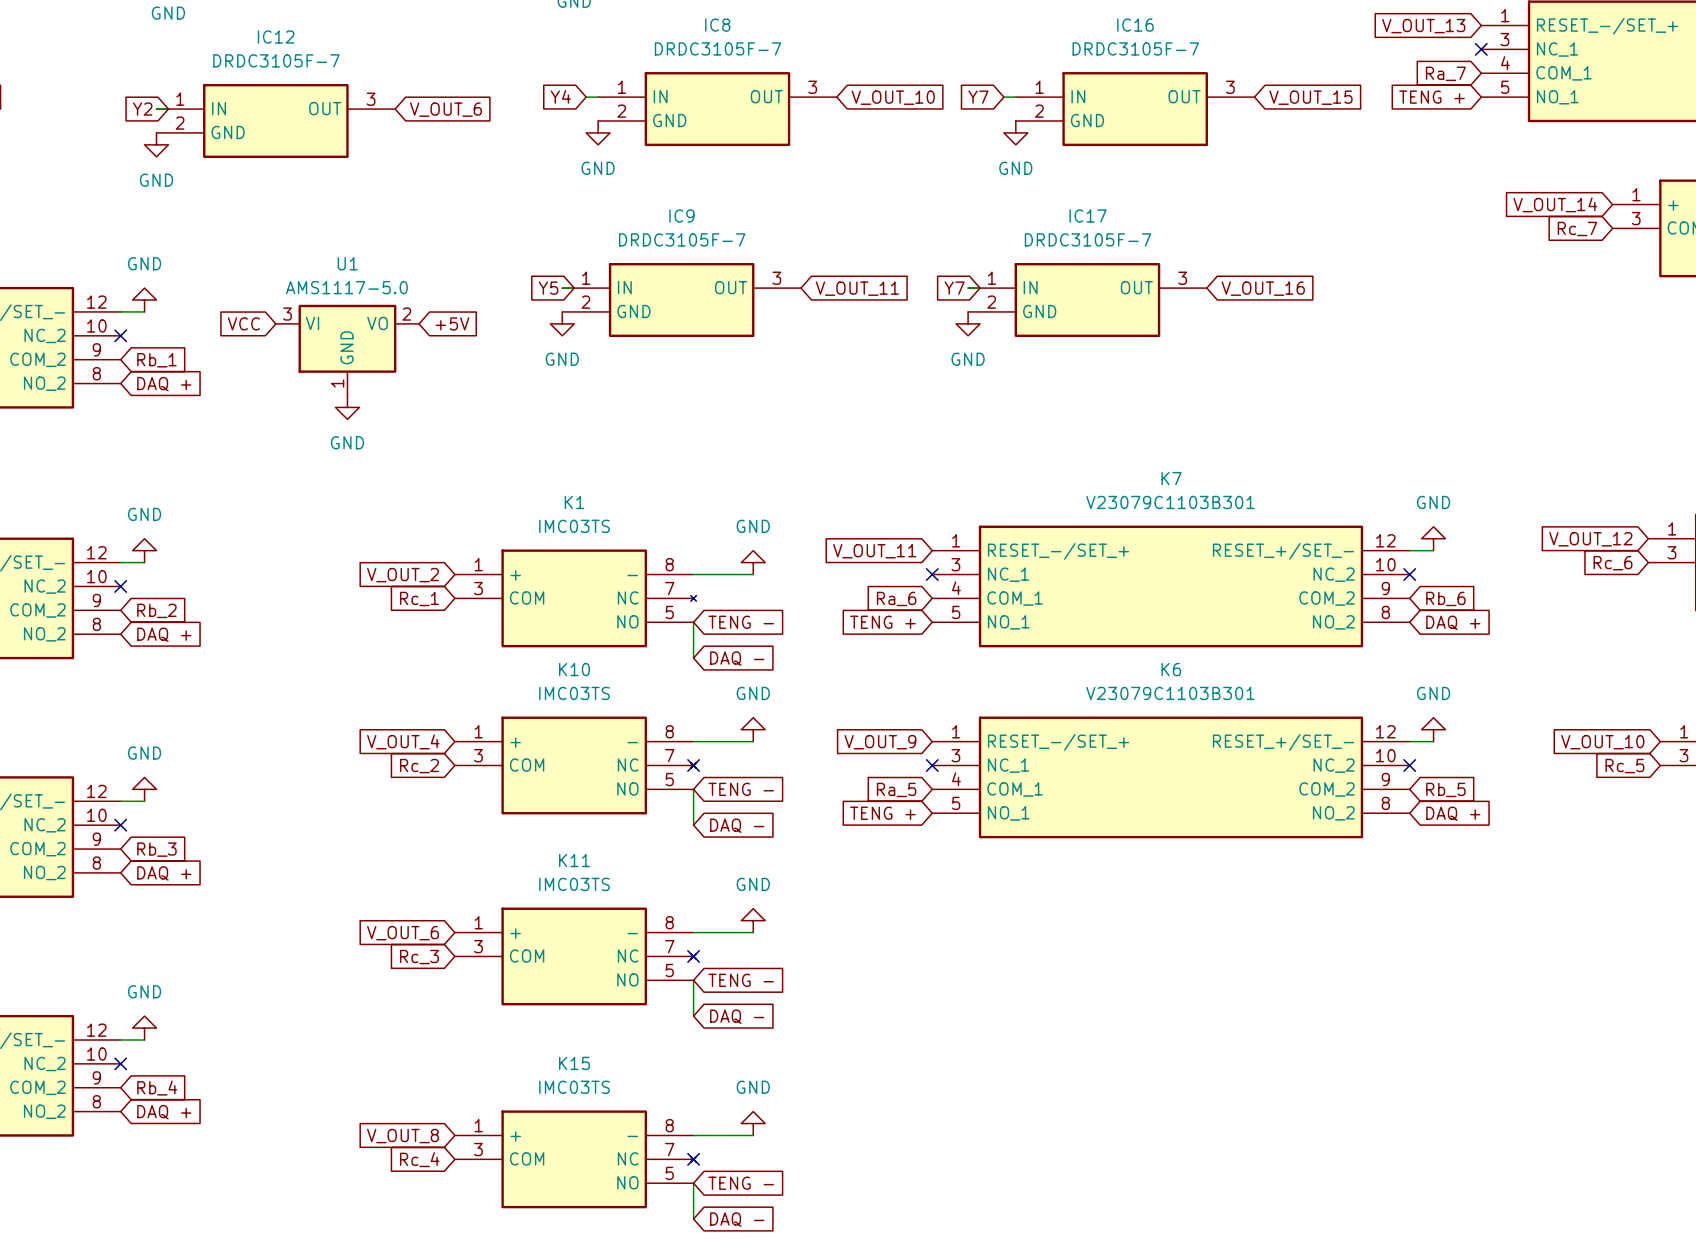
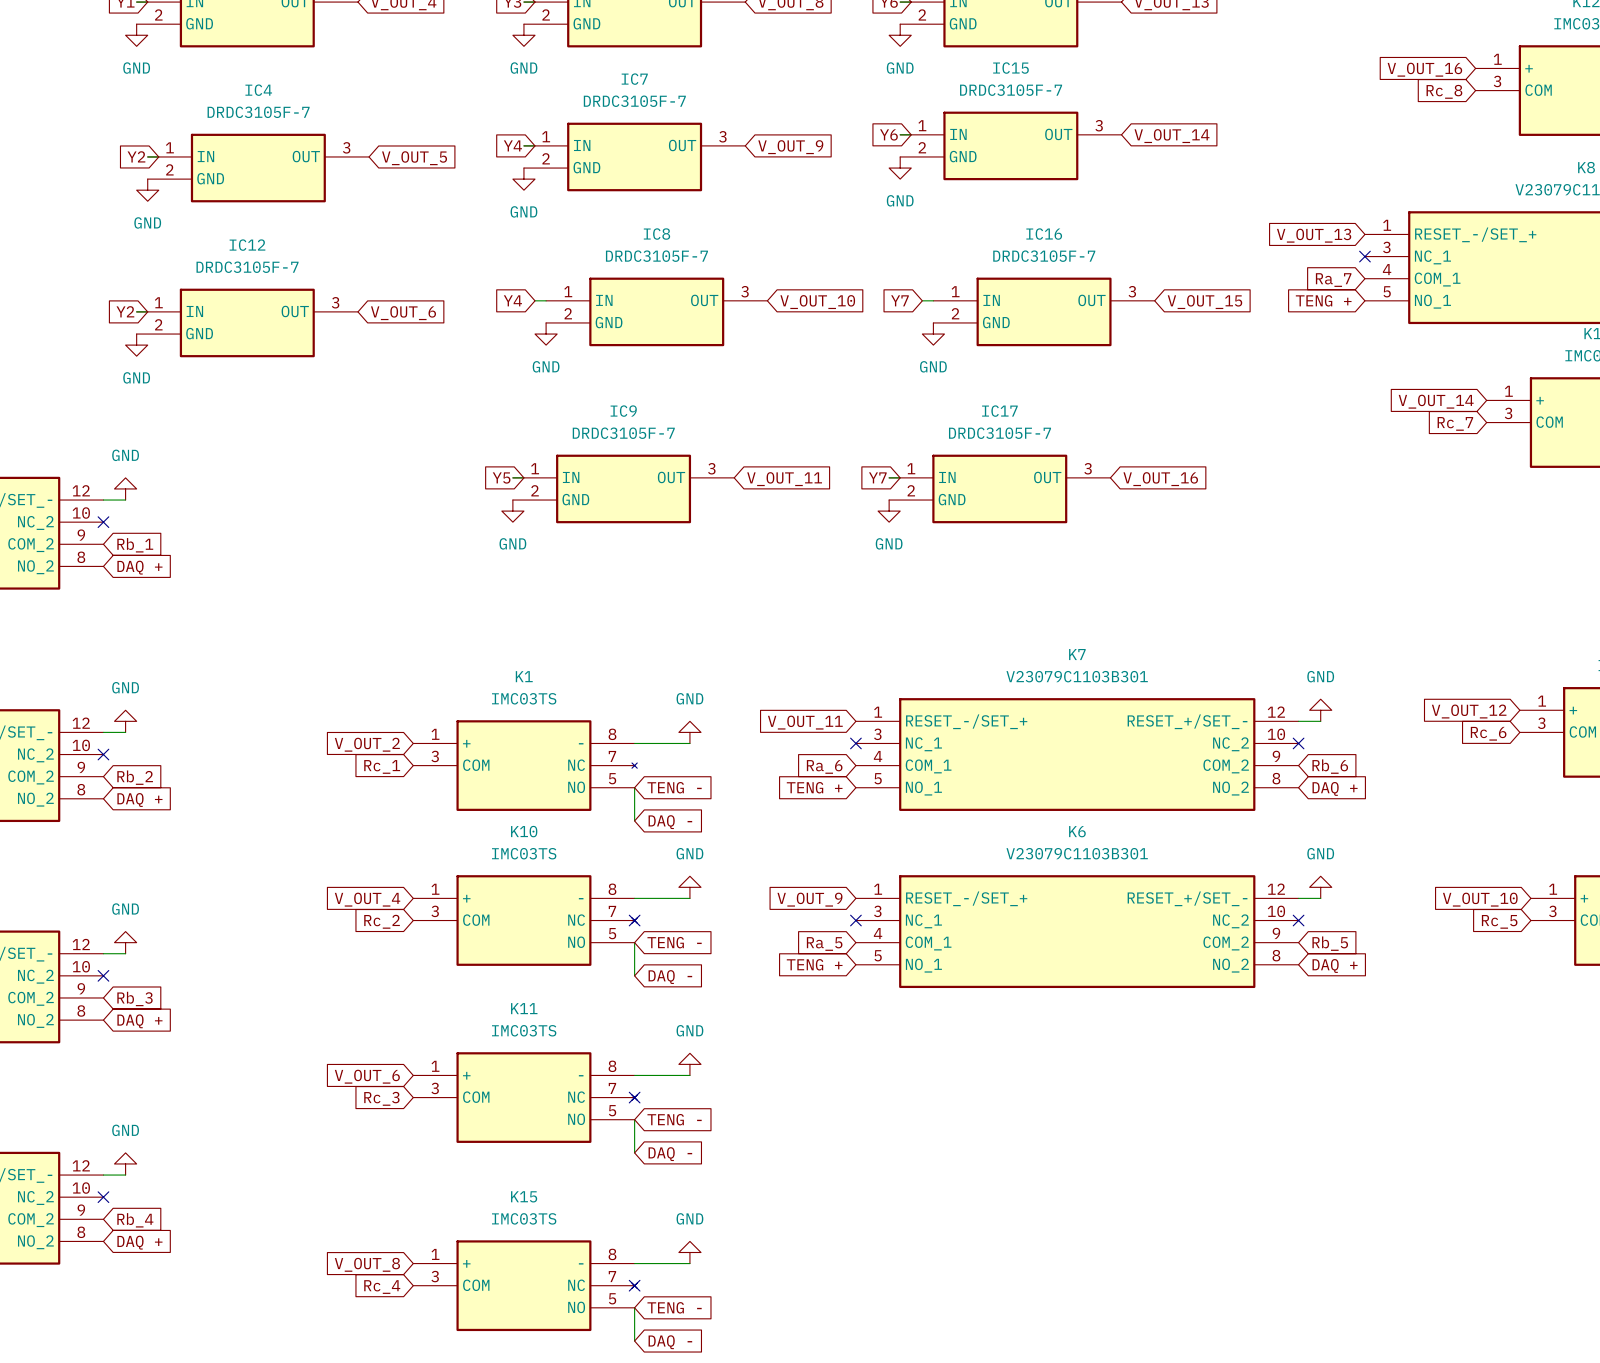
global label: VCC (243, 323) -> none
global label: +5V (452, 323) -> none
U1: AMS1117-5.0 (347, 350) -> none
power symbol: GND (347, 407) -> none

